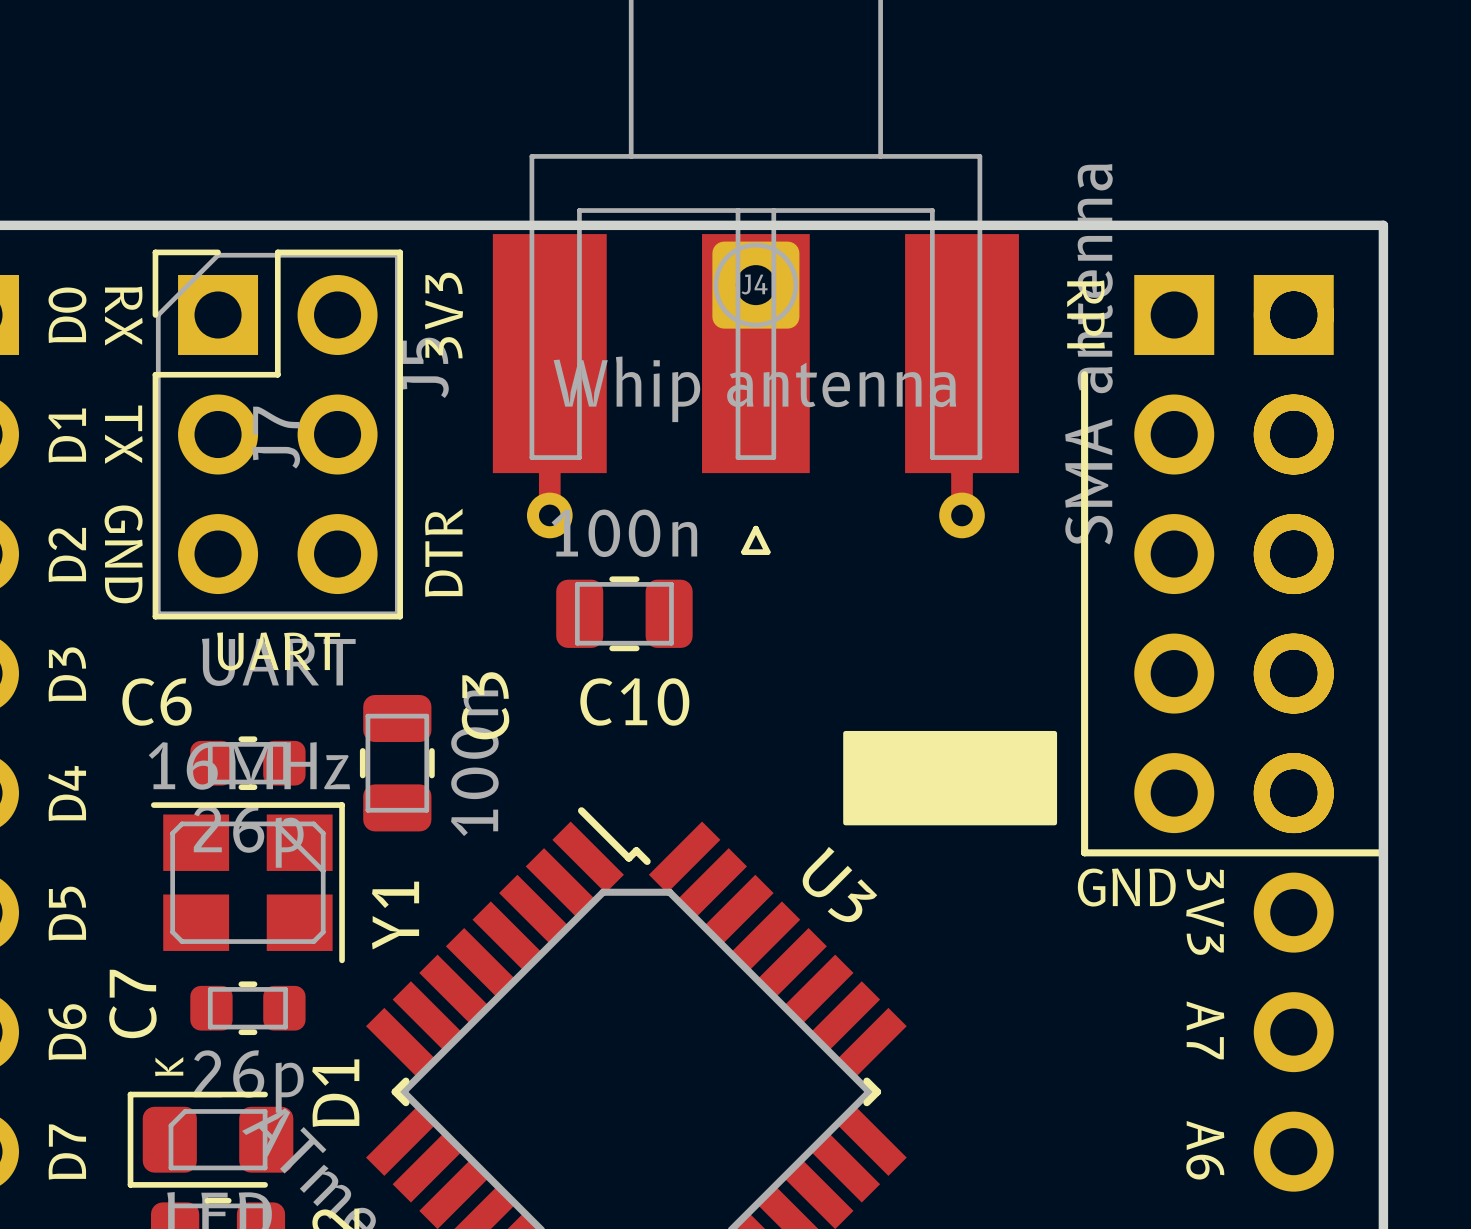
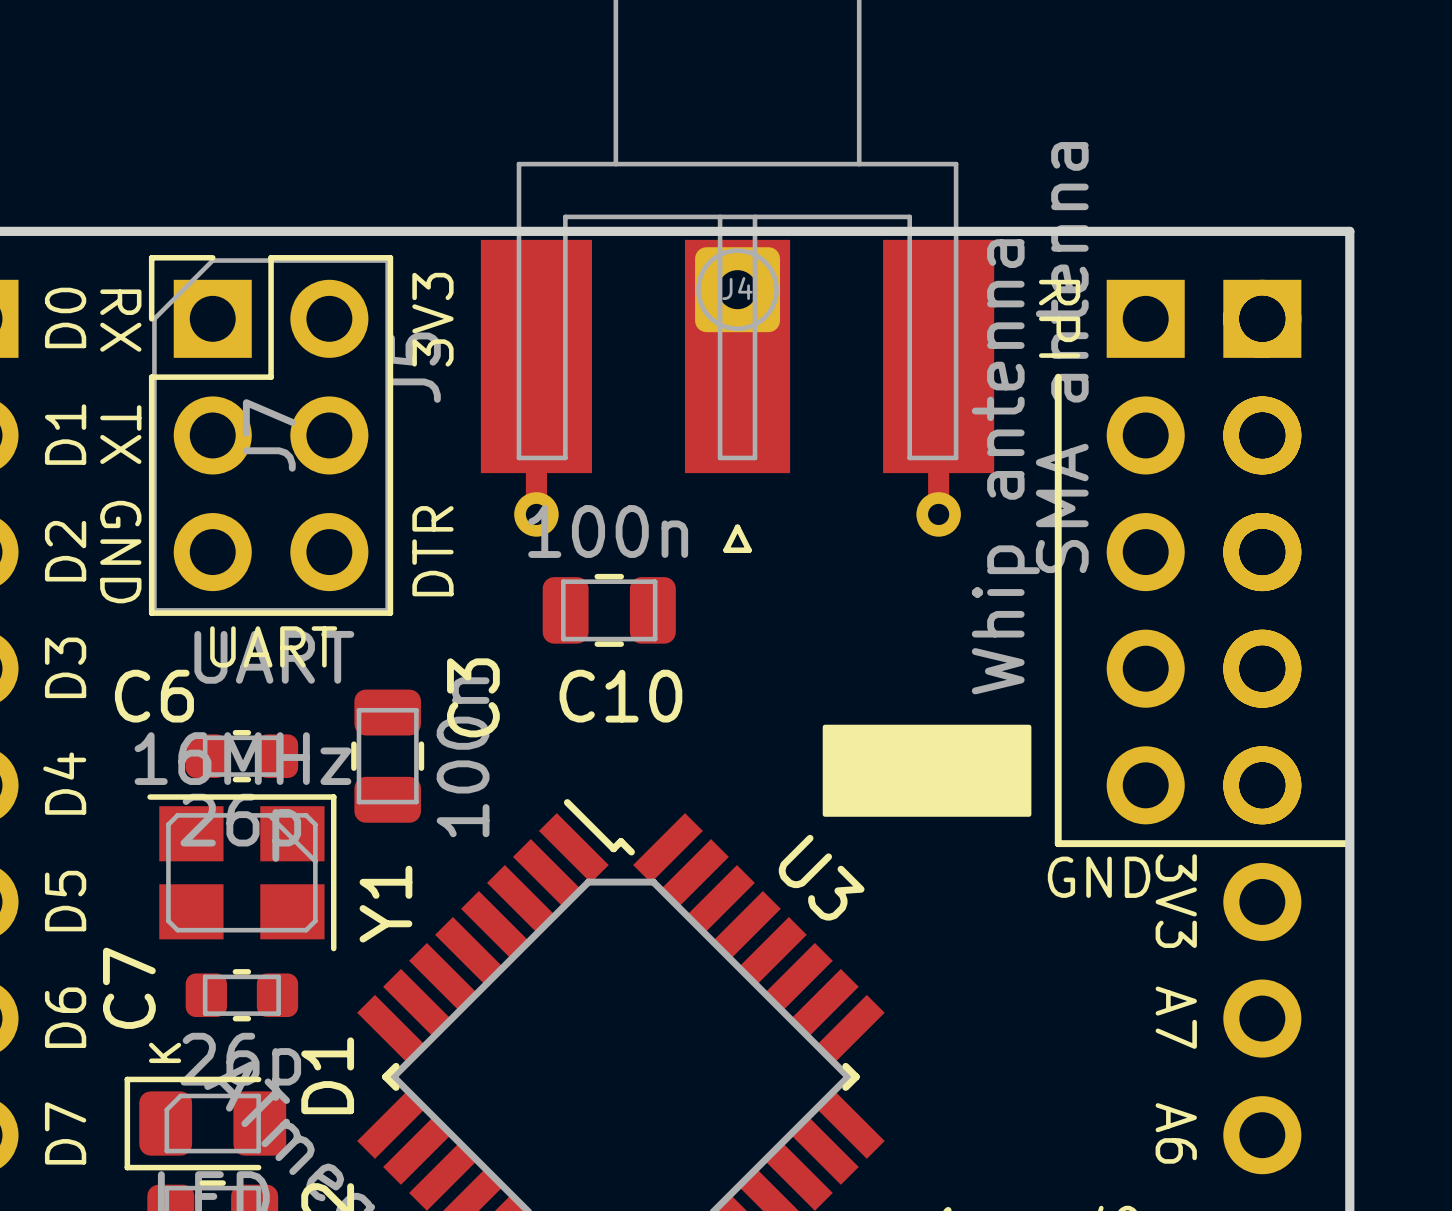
J4 value rotation: 0° (754, 389) -> 90° counterclockwise (1005, 466)

